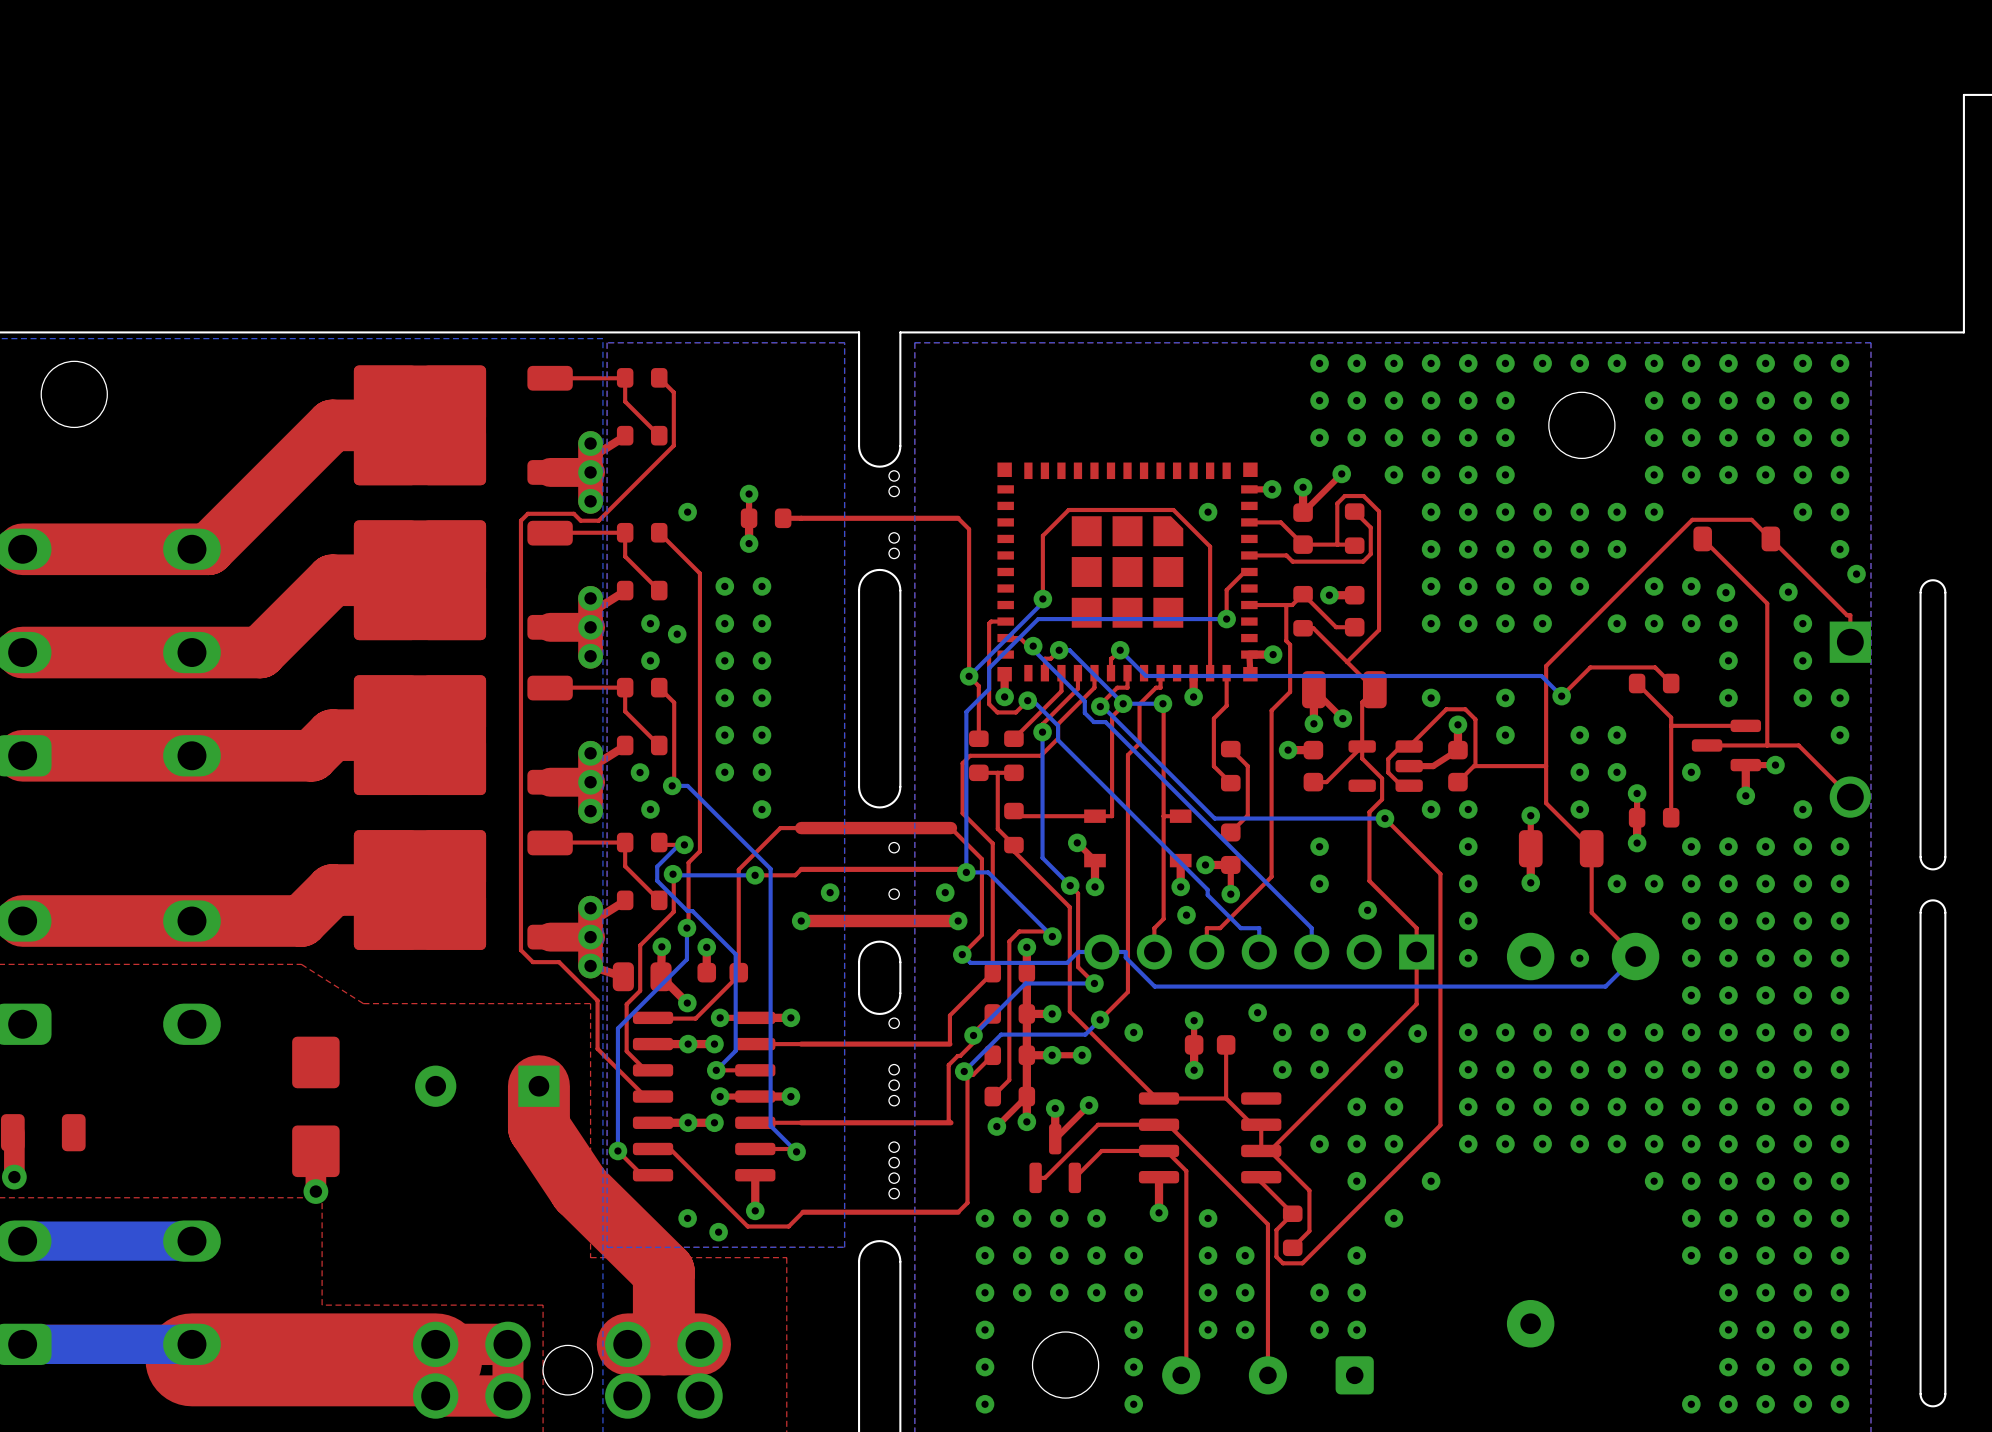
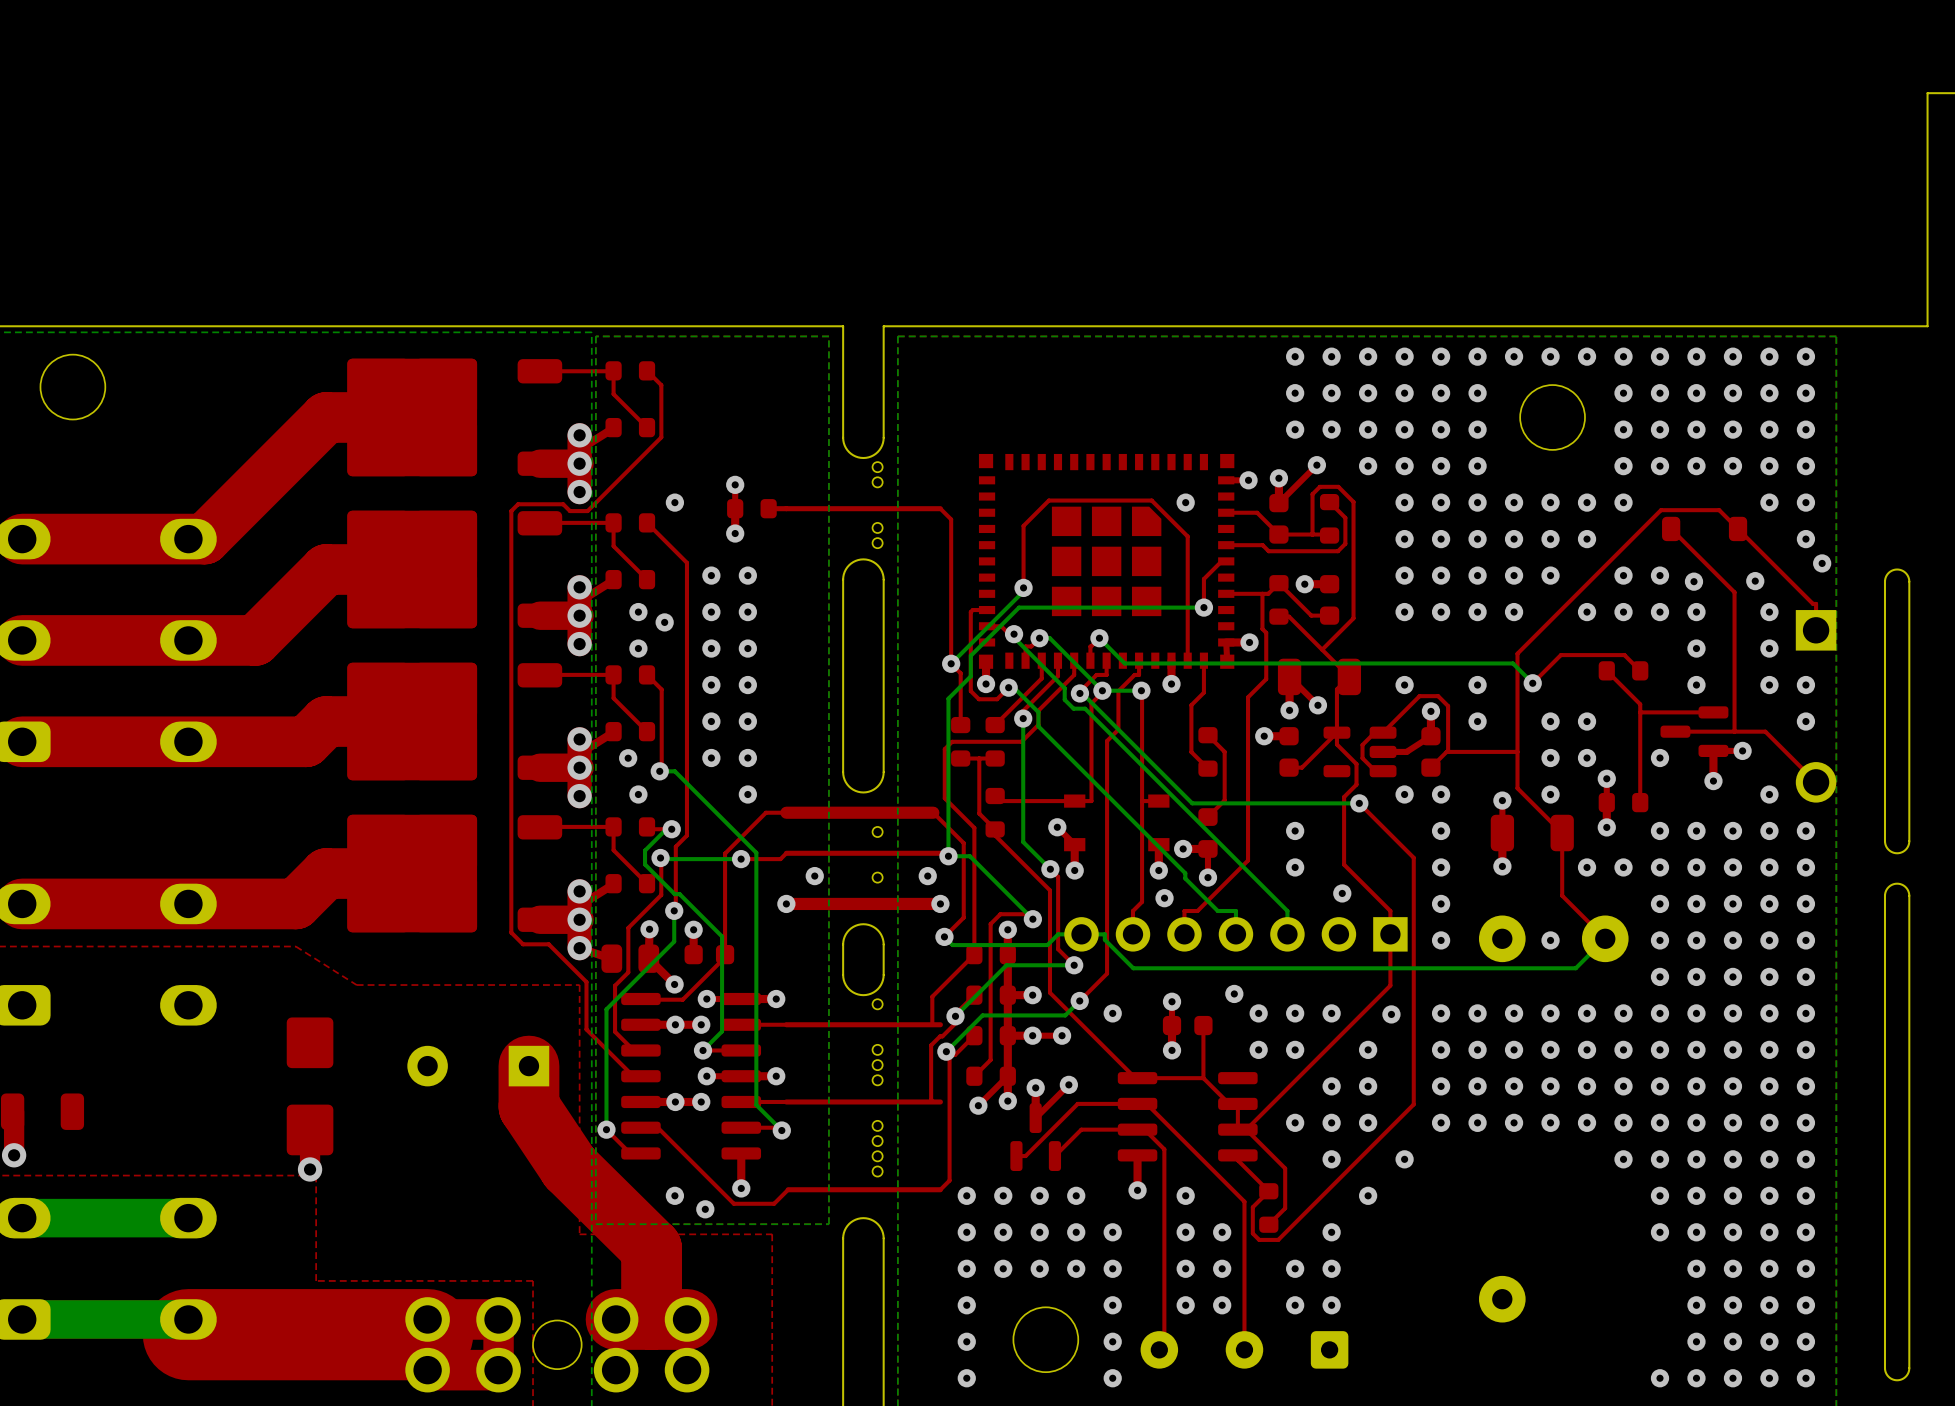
top track: none -> (940, 1024) (932, 1024)
top track: none -> (940, 1101) (933, 1101)

